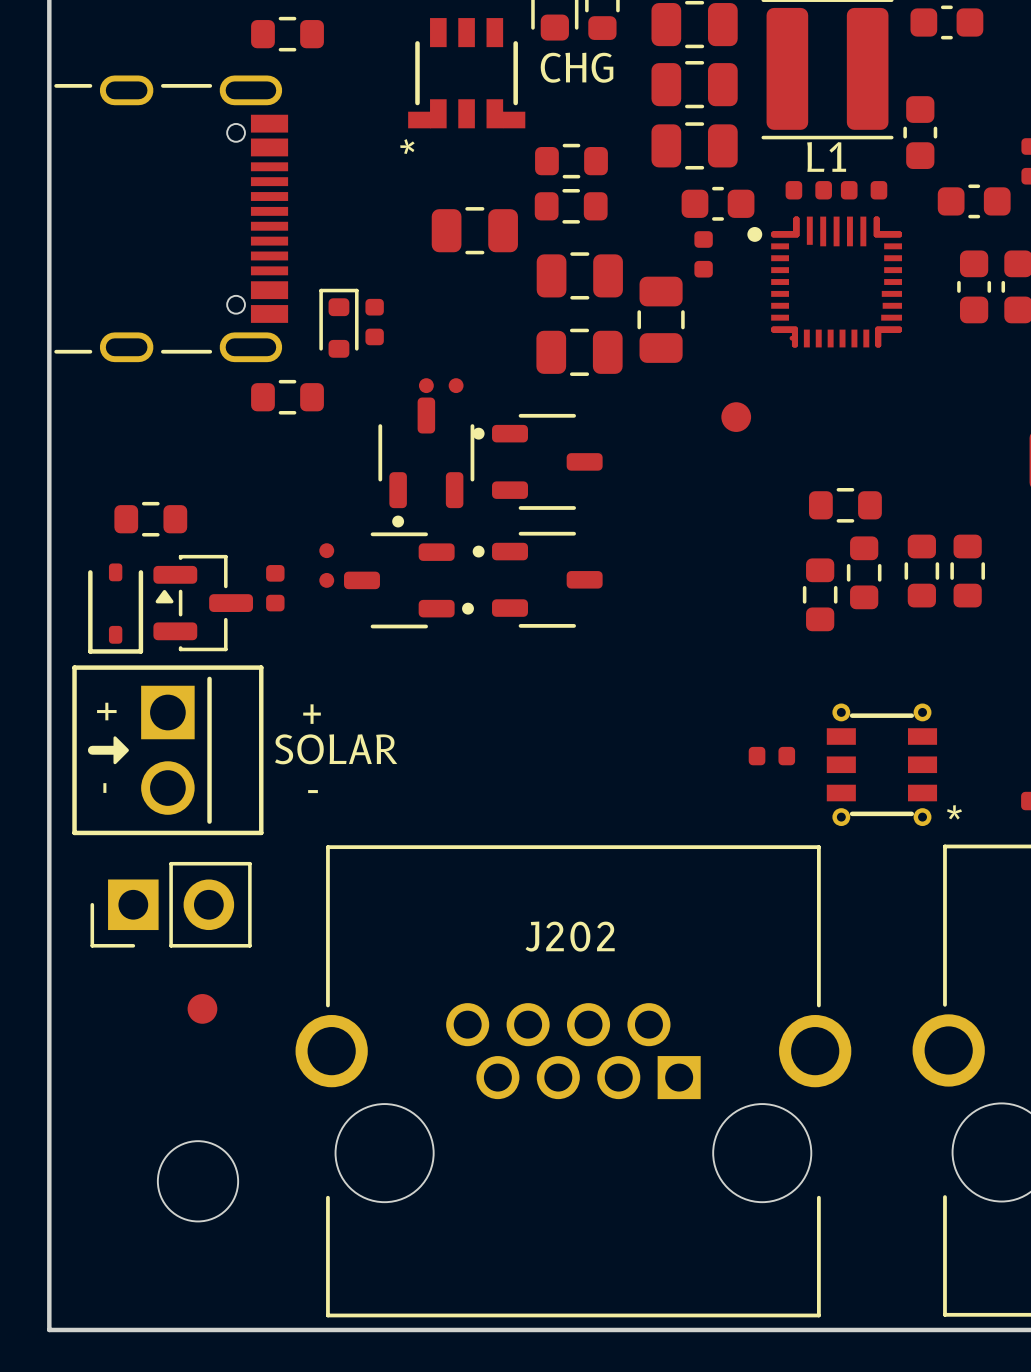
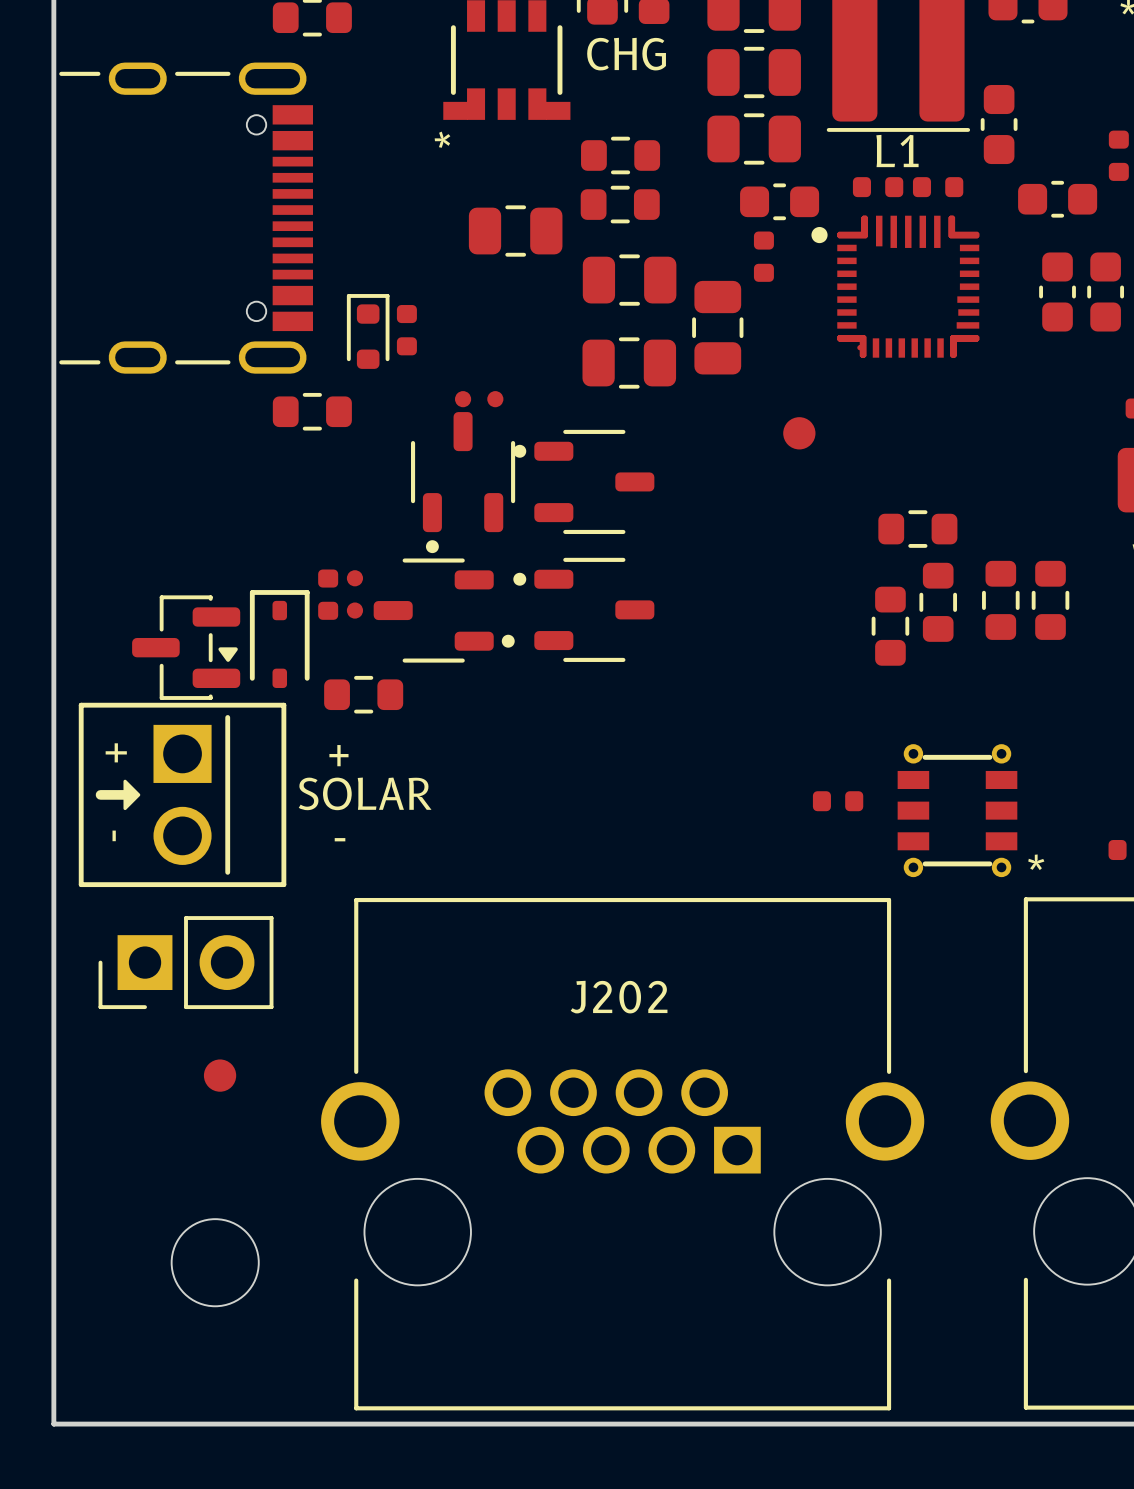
part position: (150, 519) -> (363, 694)
part position: (275, 588) -> (328, 594)
part rotation: 0° (203, 603) -> 180° (186, 647)
part rotation: 0° (115, 608) -> 180° (279, 639)
part position: (115, 608) -> (279, 639)

